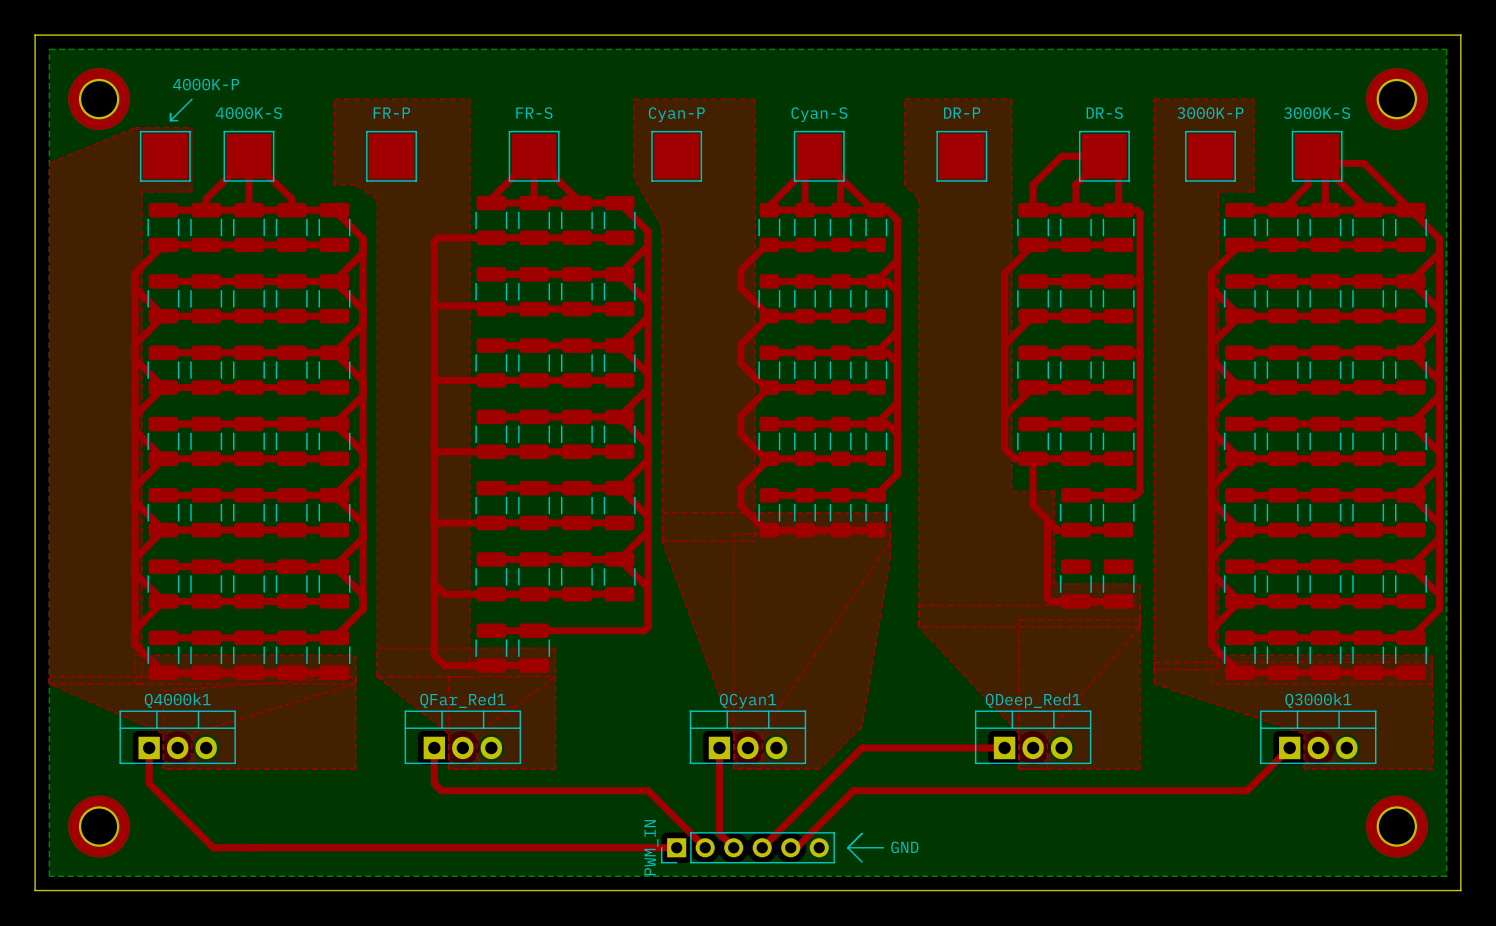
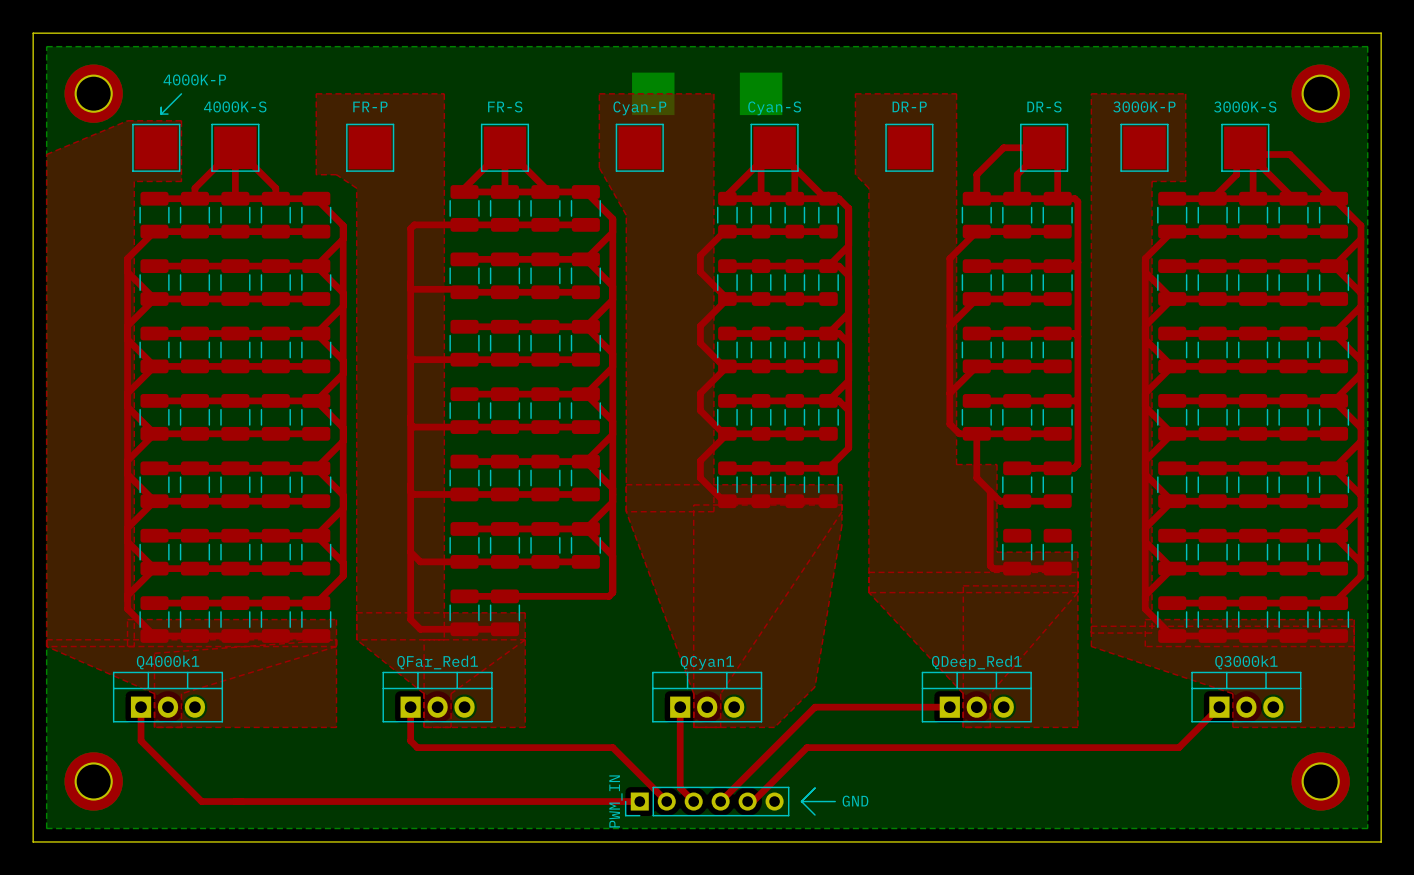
part: none -> (653, 93)
part: none -> (761, 93)

